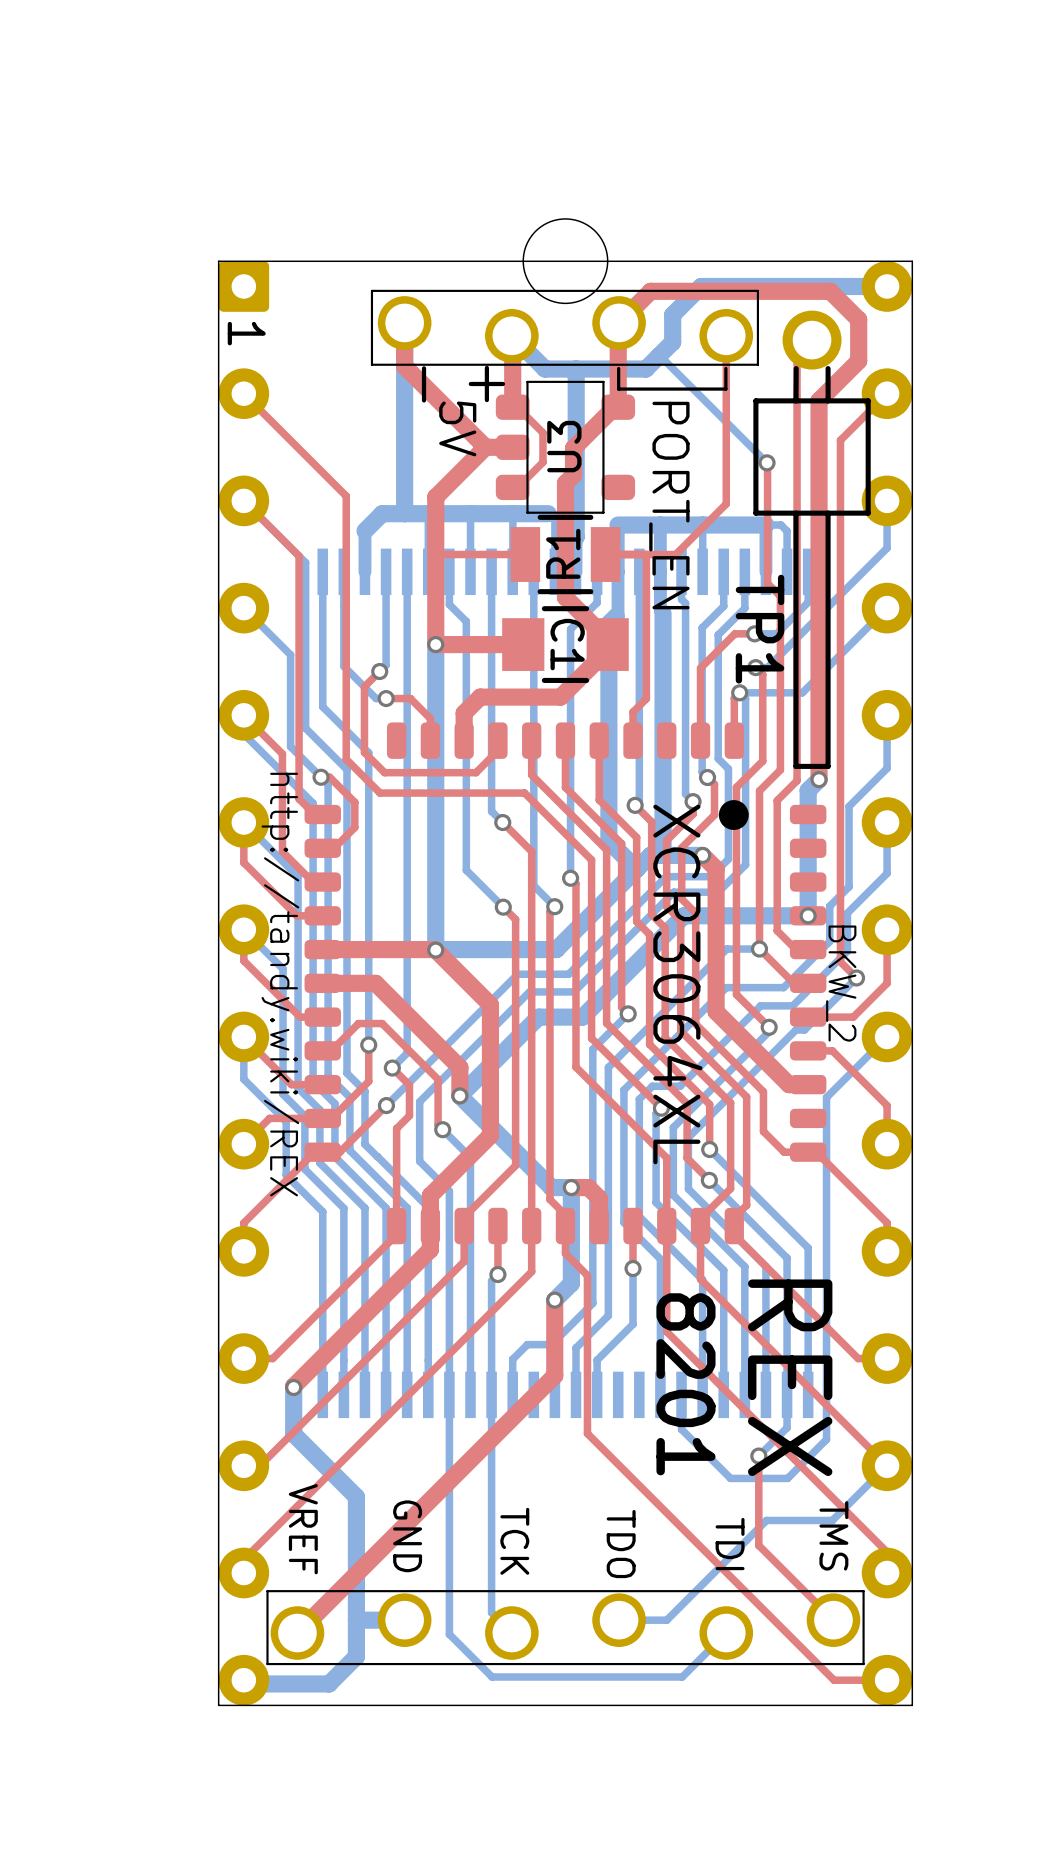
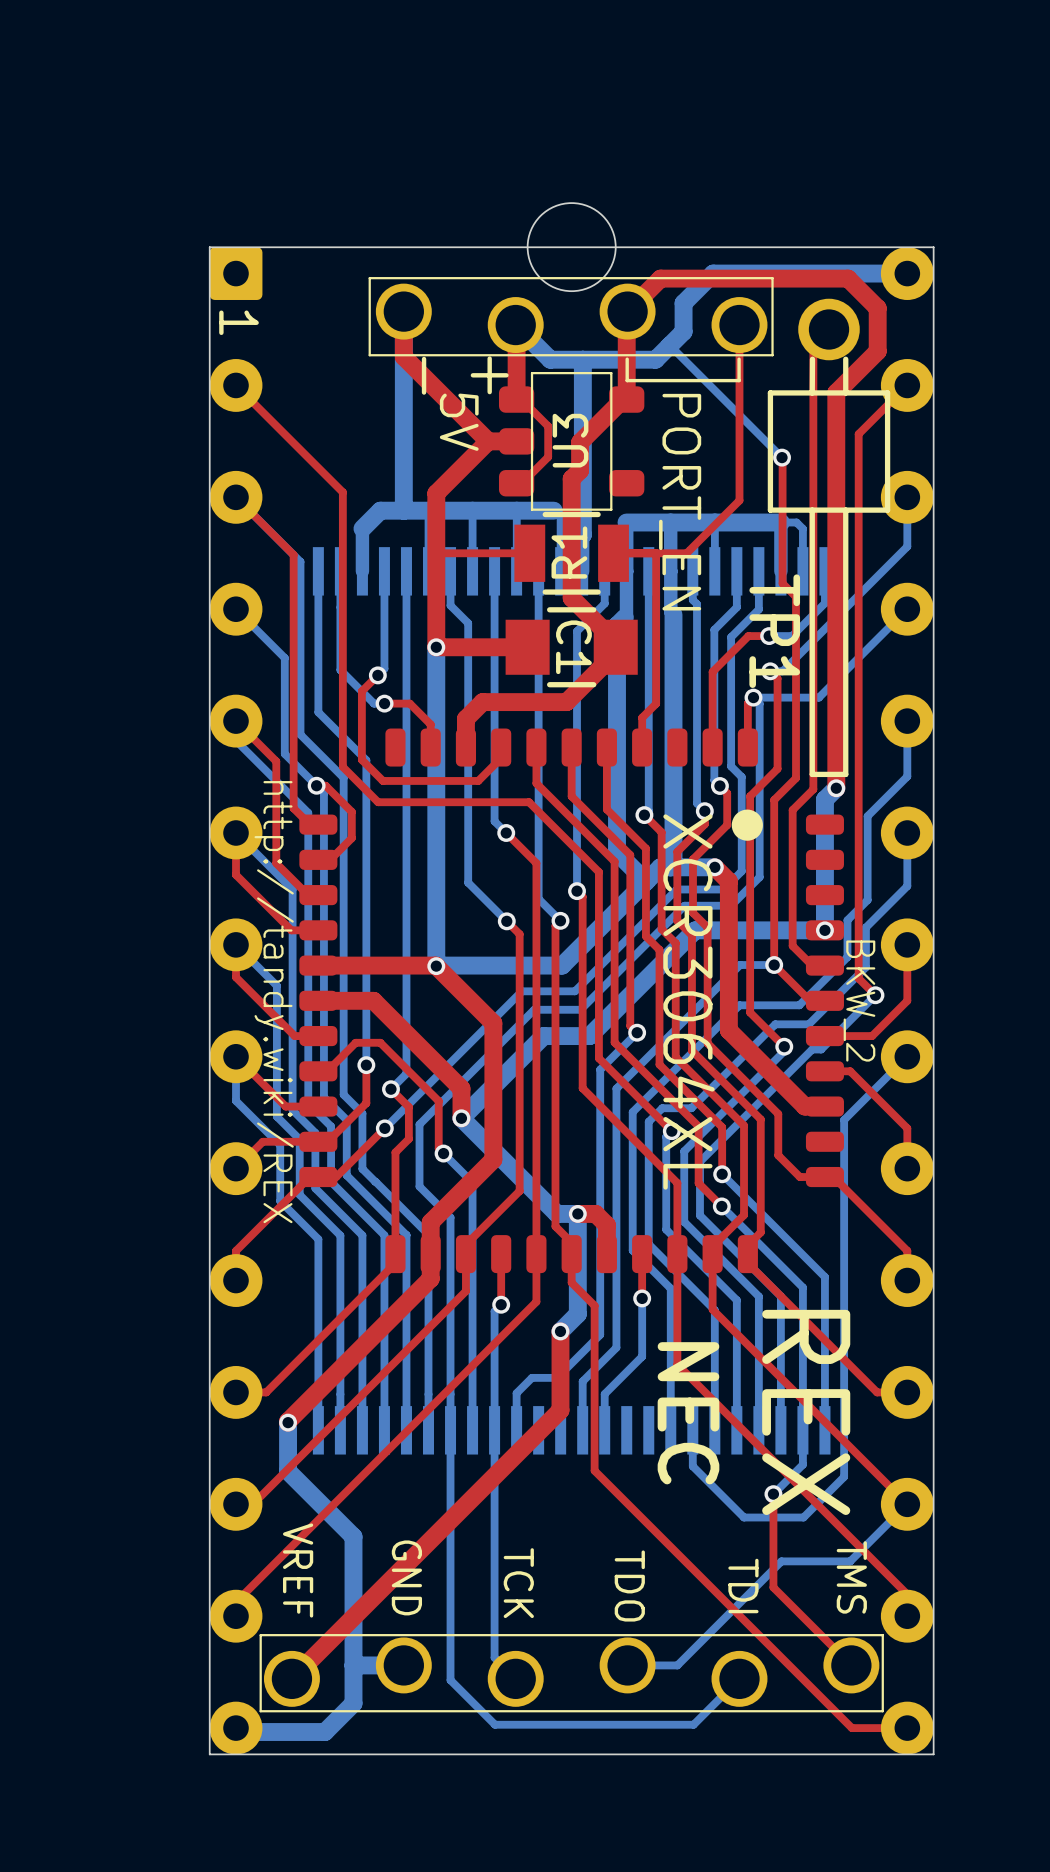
text: 8201 (685, 1384) -> NEC (688, 1413)

